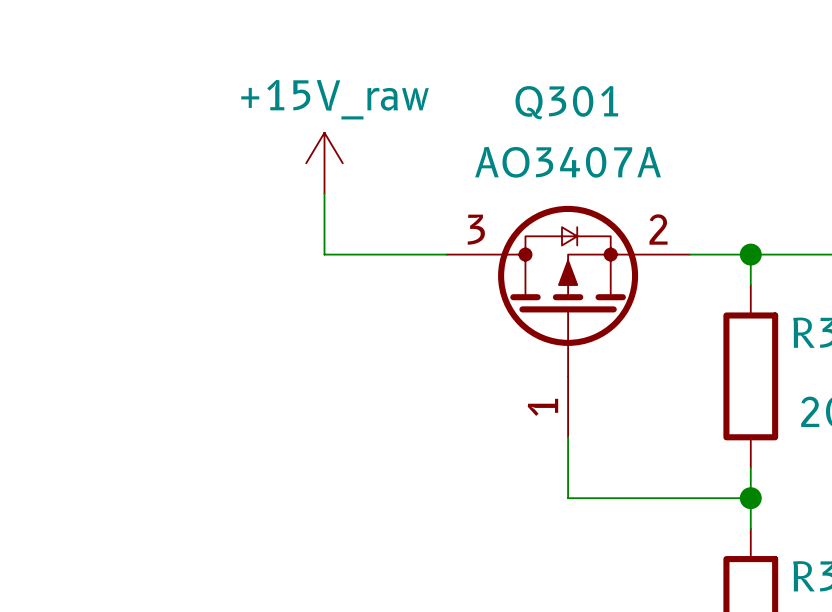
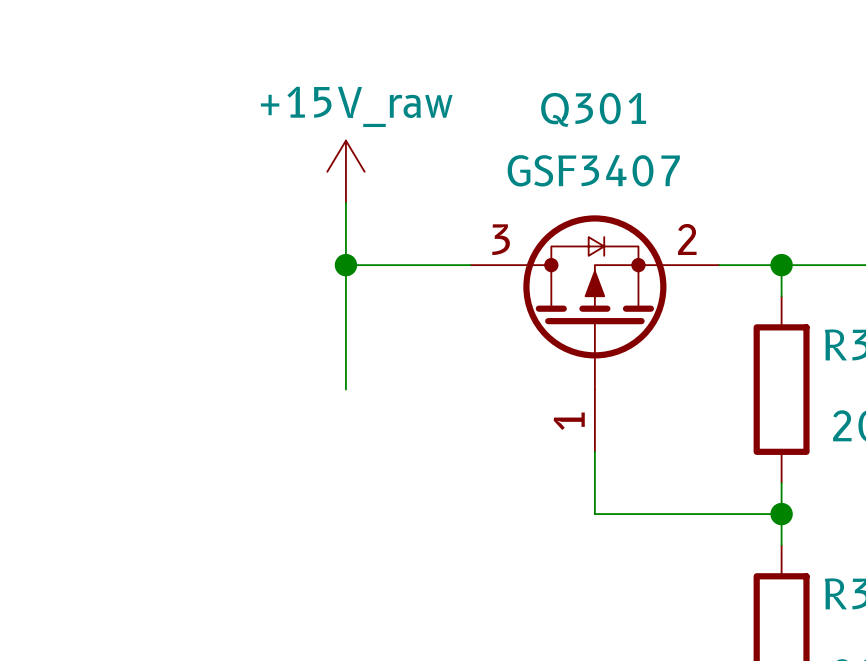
Q301 value: AO3407A (568, 162) -> GSF3407 (593, 170)
wire: none -> (345, 265) (345, 389)
junction: none -> (345, 265)

